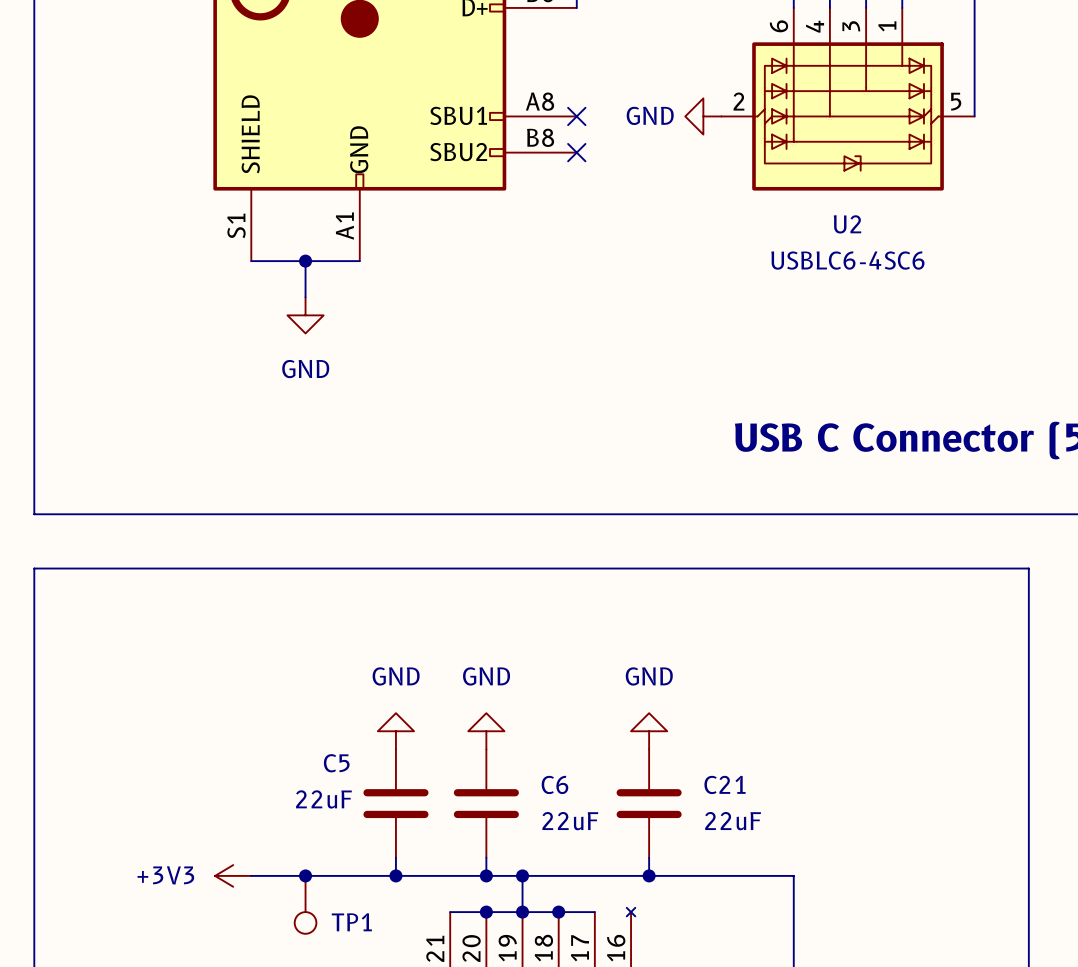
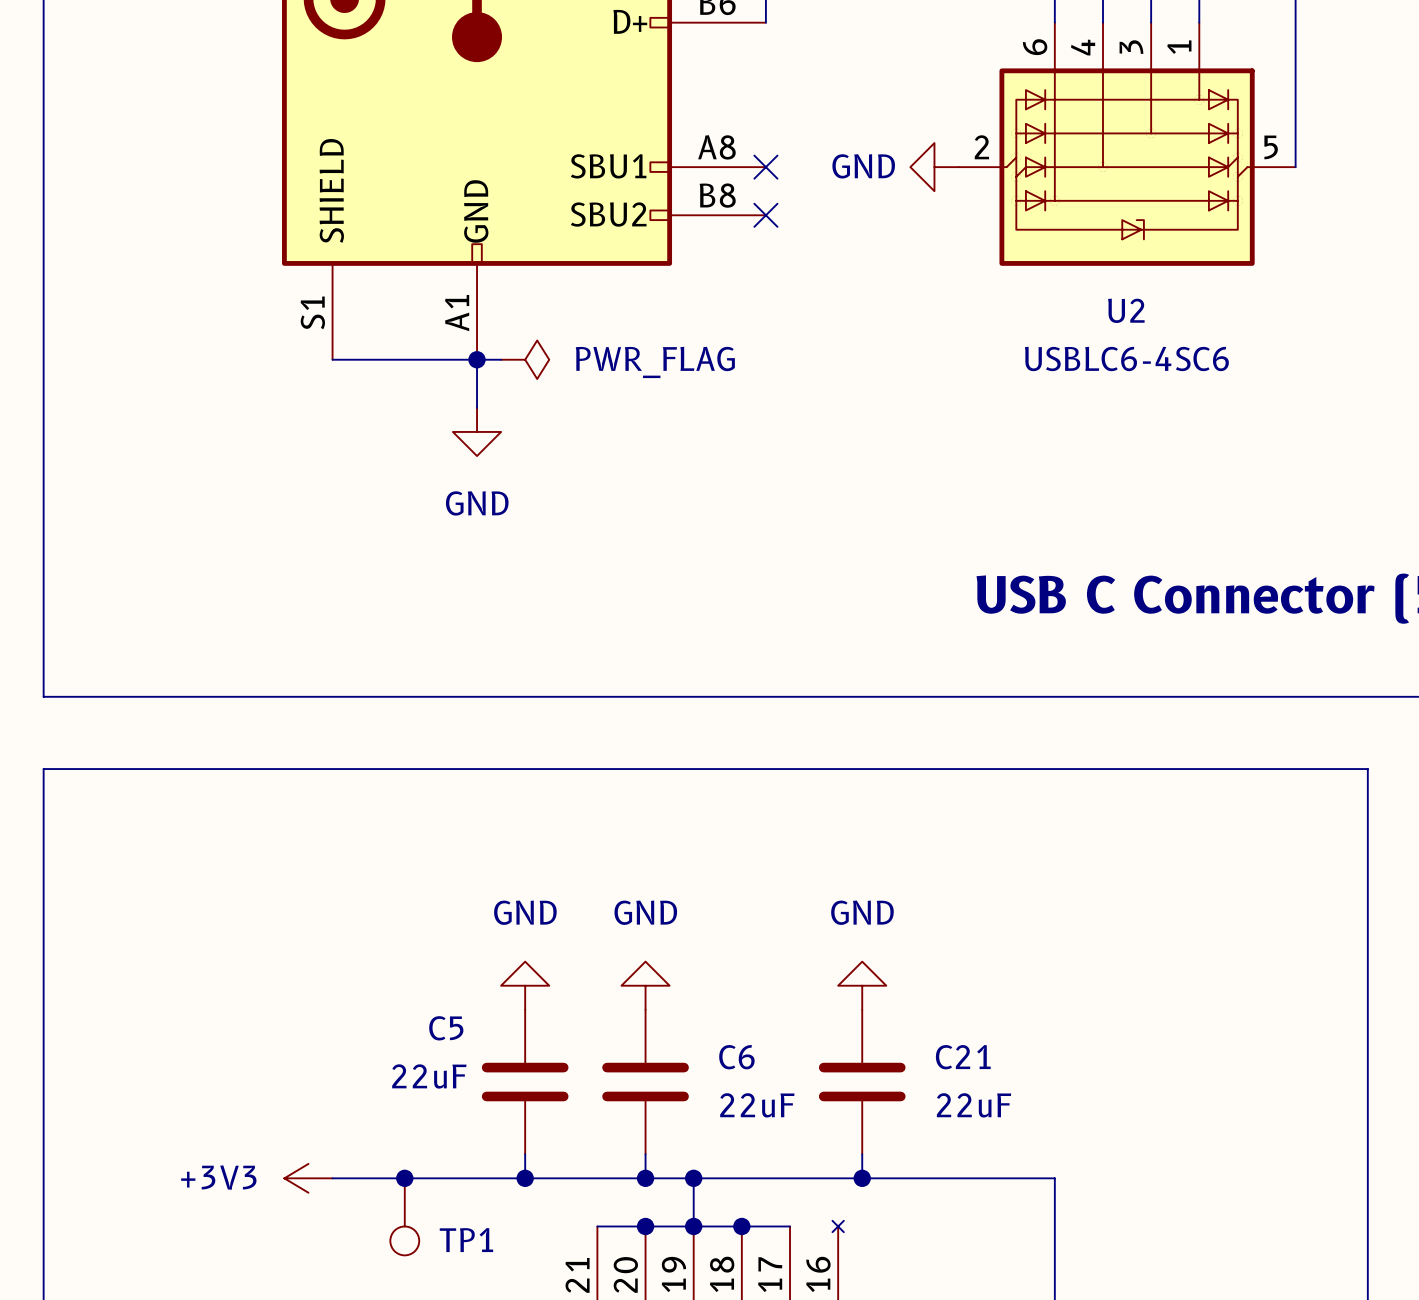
wire: (305, 261) (305, 297) -> none
junction position: (305, 261) -> (477, 359)
wire: none -> (501, 359) (477, 359) (477, 407)
power symbol: none -> PWR_FLAG (525, 359)
power symbol position: GND (305, 315) -> GND (477, 431)

